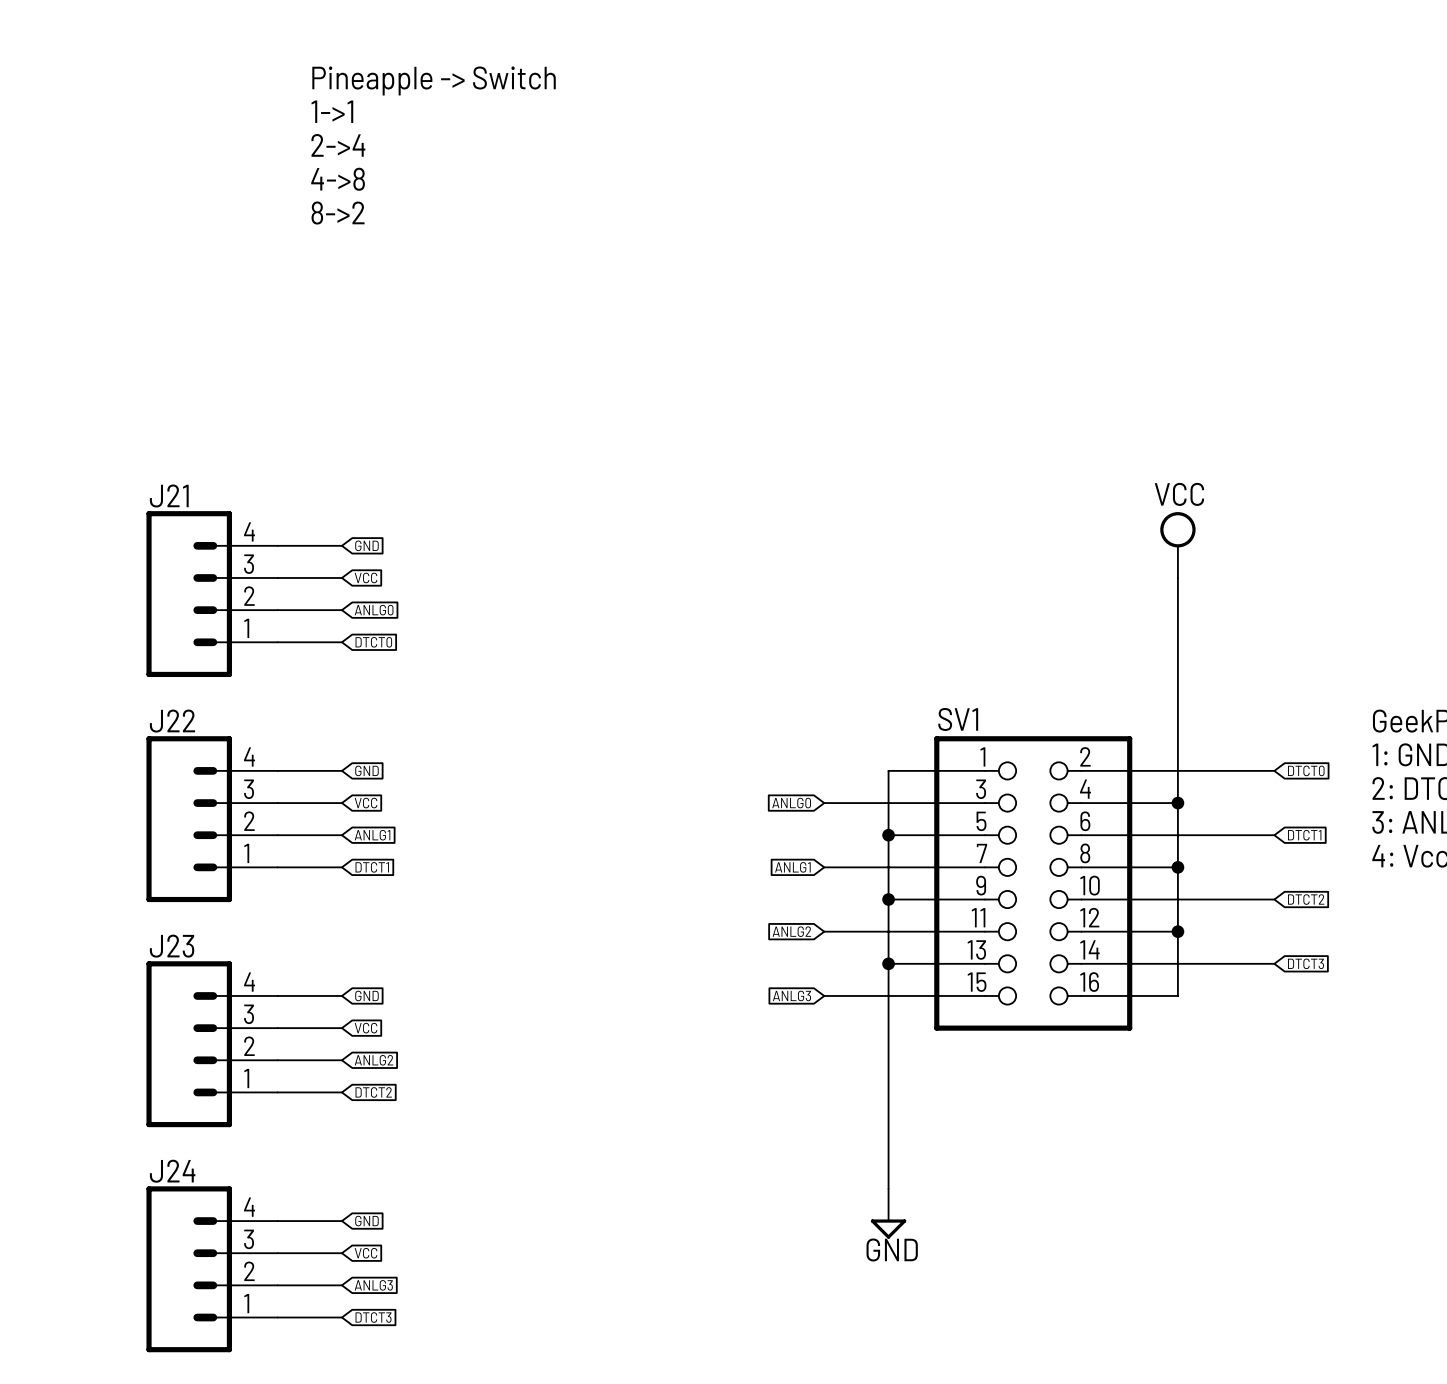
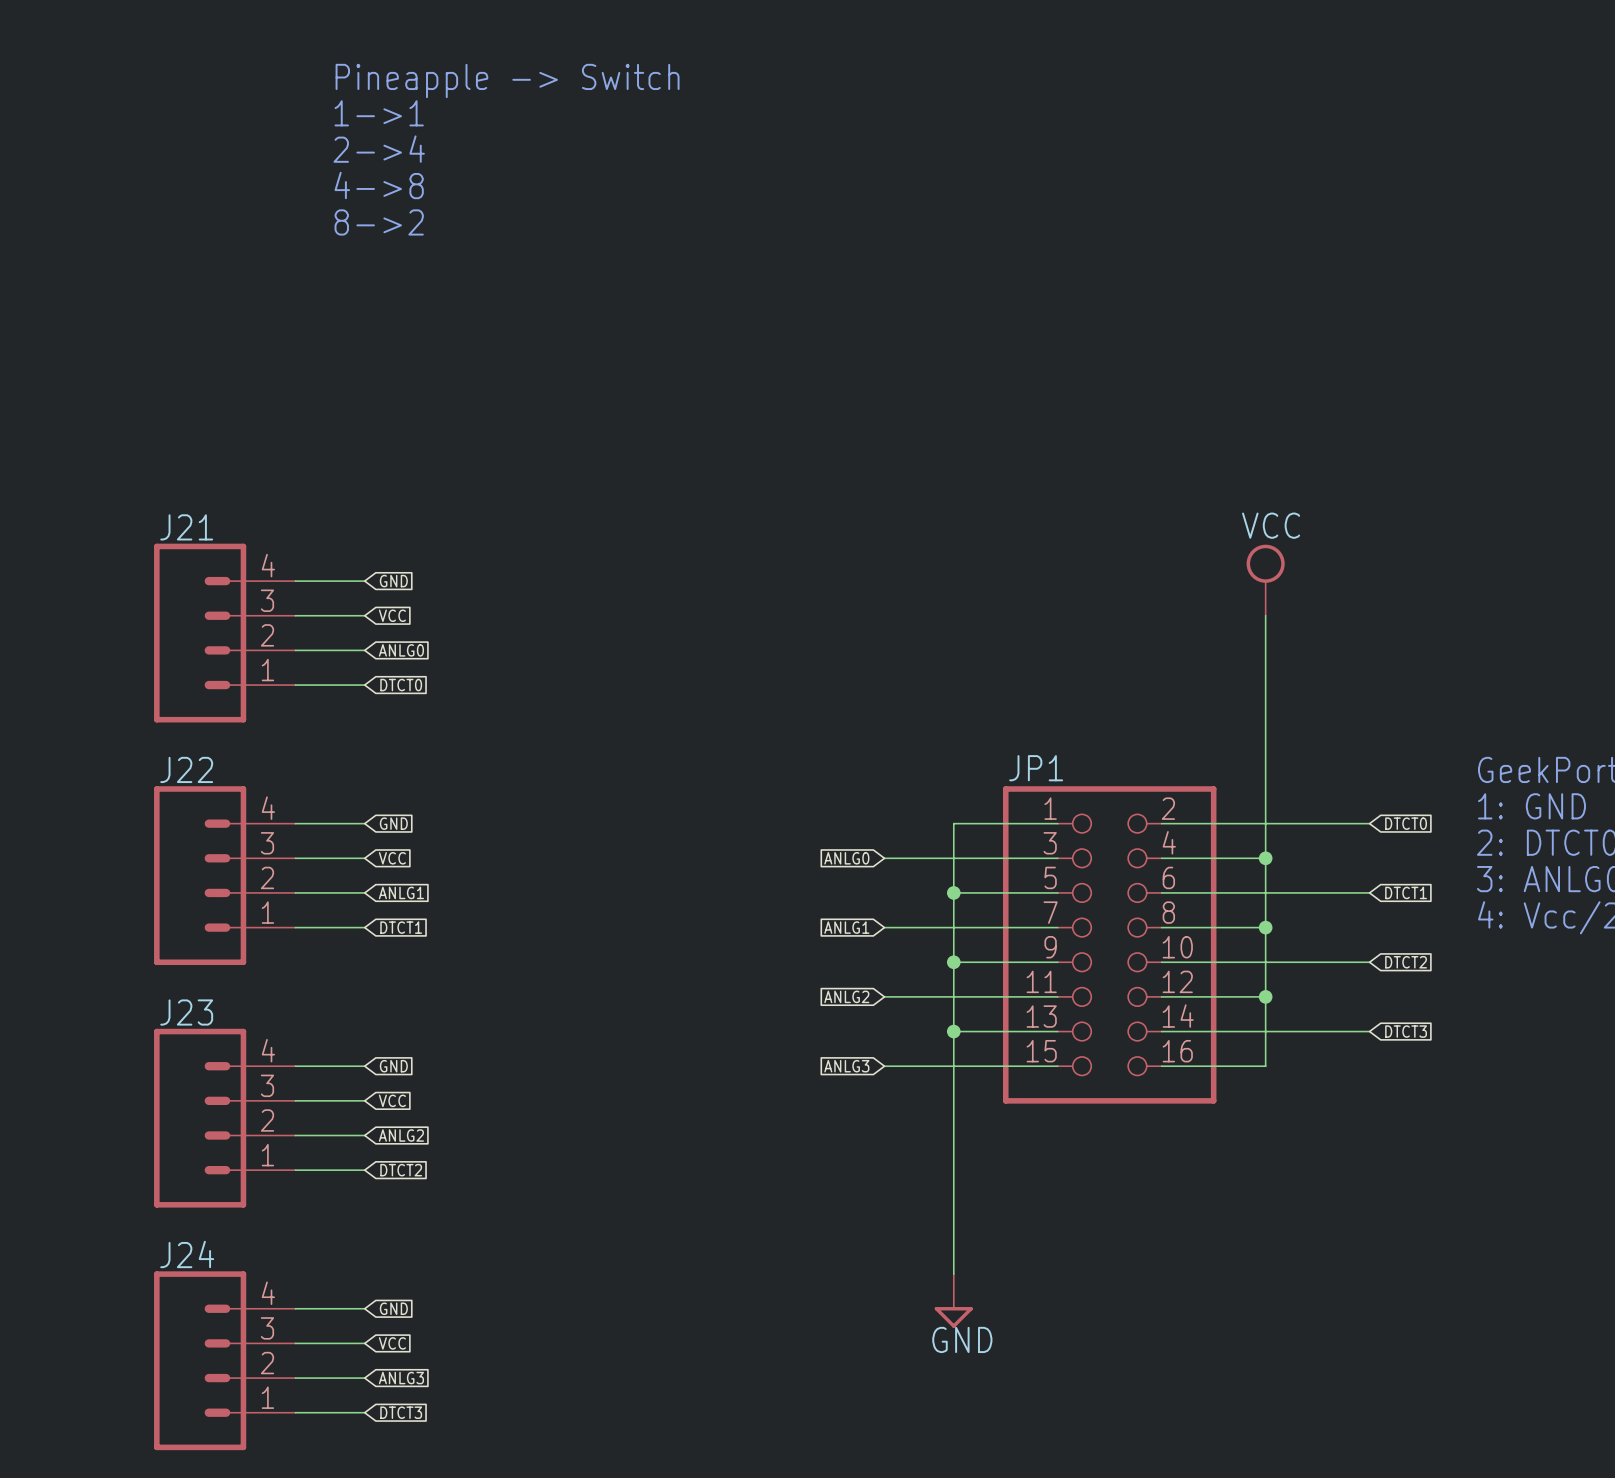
SV1 name: SV1 (958, 719) -> JP1 (1036, 768)

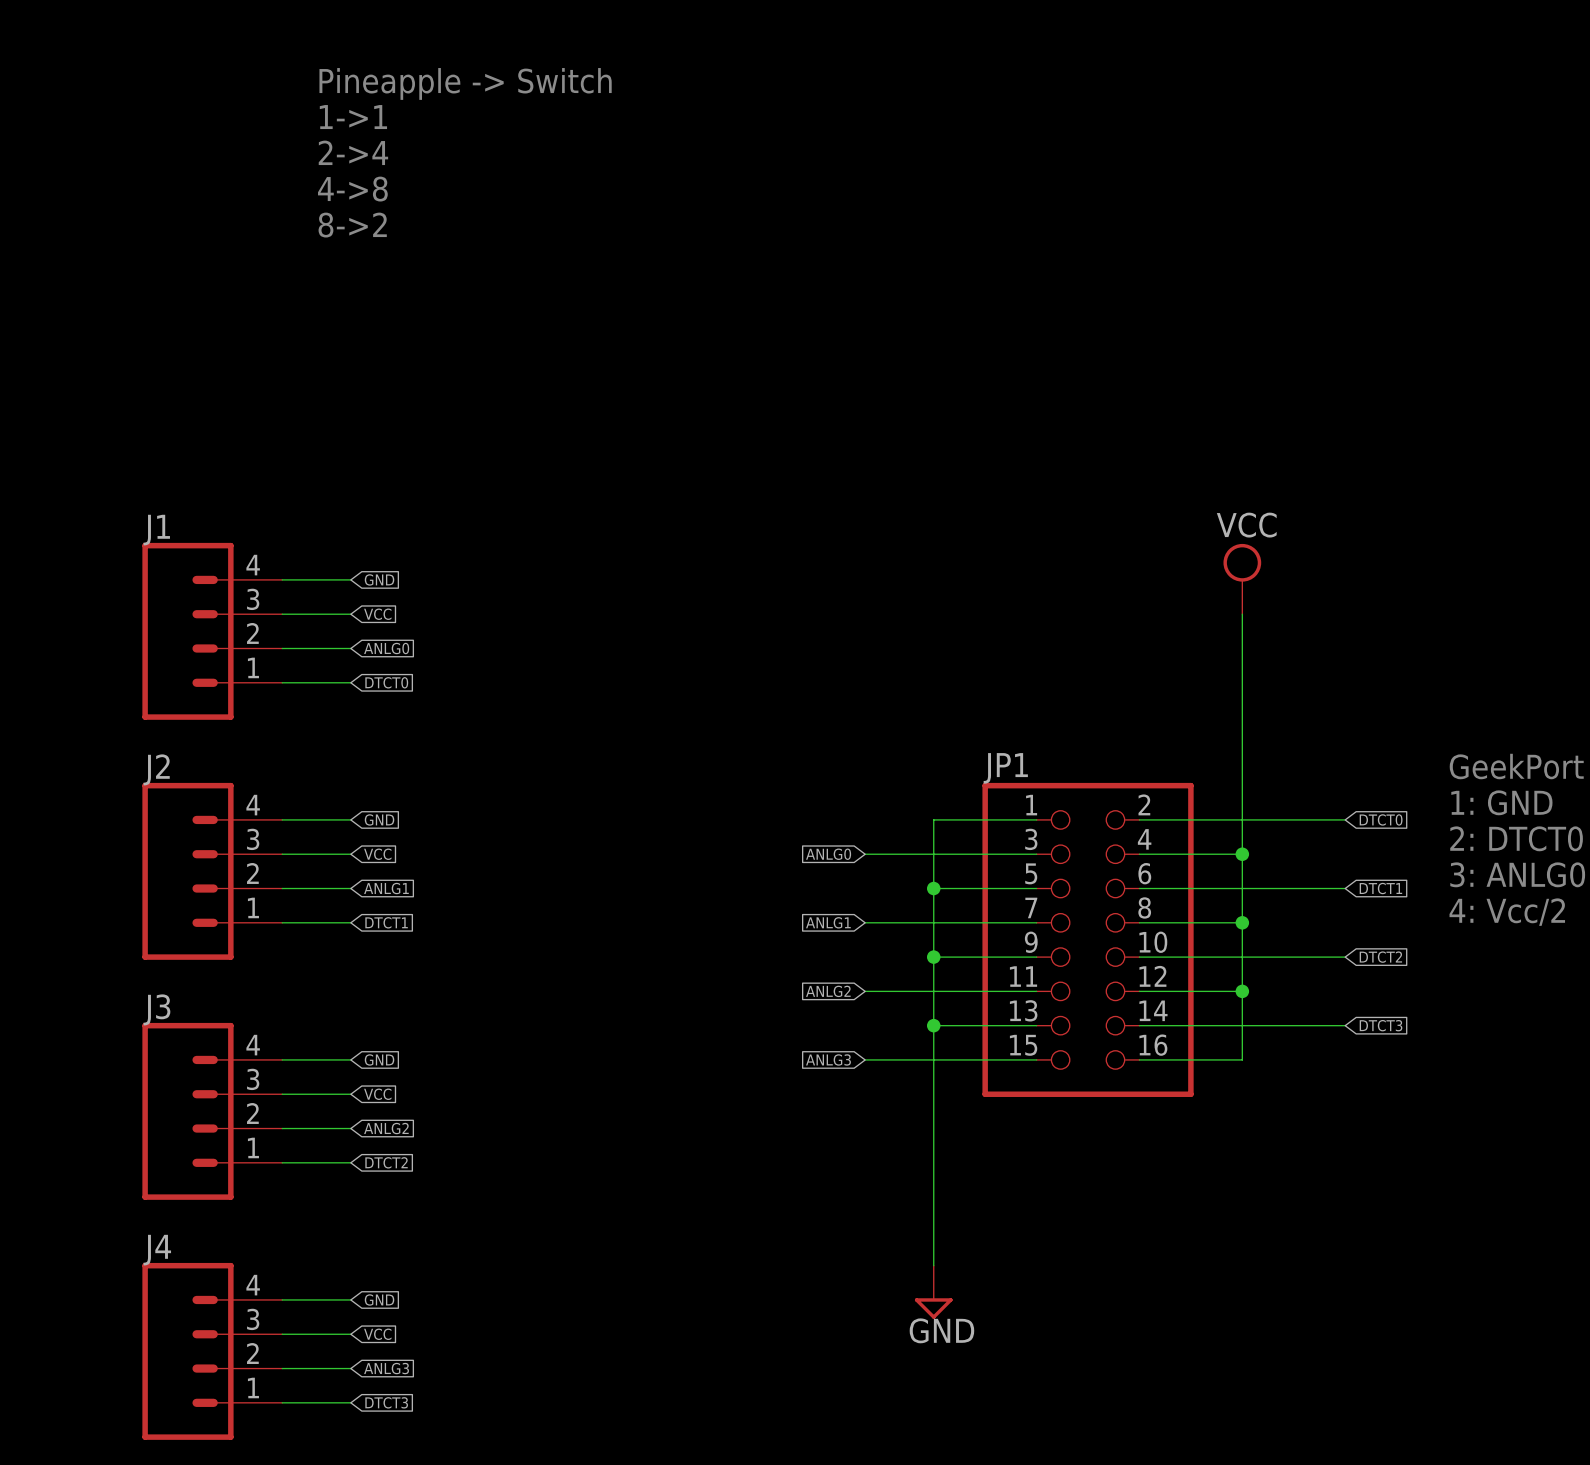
J21 name: J21 (186, 527) -> J1 (156, 530)
J22 name: J22 (186, 769) -> J2 (156, 769)
J23 name: J23 (186, 1012) -> J3 (156, 1009)
J24 name: J24 (187, 1254) -> J4 (157, 1250)

